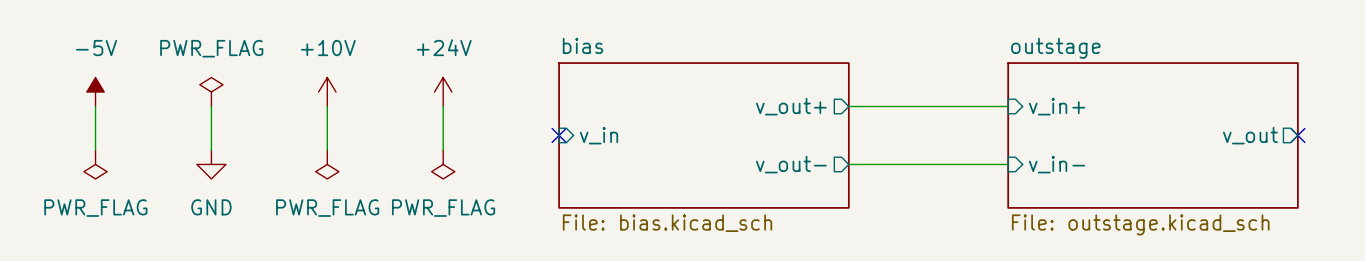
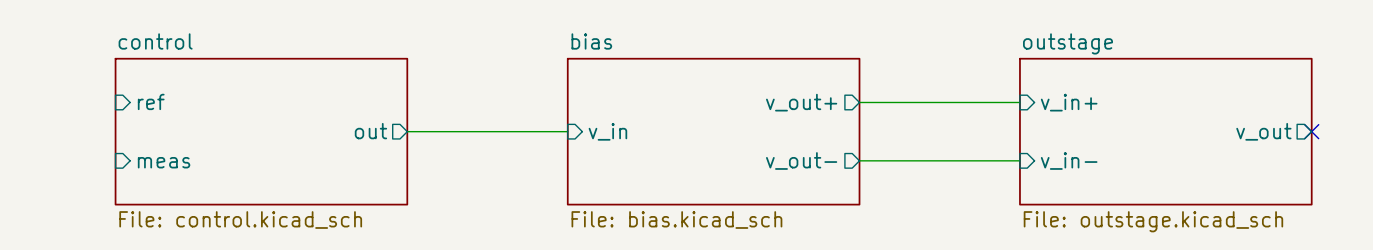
power symbol: -5V (95, 92) -> none
power symbol: PWR_FLAG (211, 92) -> none
power symbol: +10V (327, 92) -> none
power symbol: +24V (443, 92) -> none
sheet pin: none -> ref (151, 101)
wire: (95, 106) (95, 149) -> none
wire: (211, 106) (211, 149) -> none
wire: (327, 106) (327, 149) -> none
wire: (443, 106) (443, 149) -> none
sheet pin: none -> out (370, 131)
sheet control: none -> File: control.kicad_sch (261, 131)
wire: none -> (407, 131) (567, 131)
no-connect mark: (559, 135) -> none
power symbol: PWR_FLAG (95, 164) -> none
power symbol: GND (211, 164) -> none
power symbol: PWR_FLAG (327, 164) -> none
power symbol: PWR_FLAG (443, 164) -> none
sheet pin: none -> meas (164, 162)

